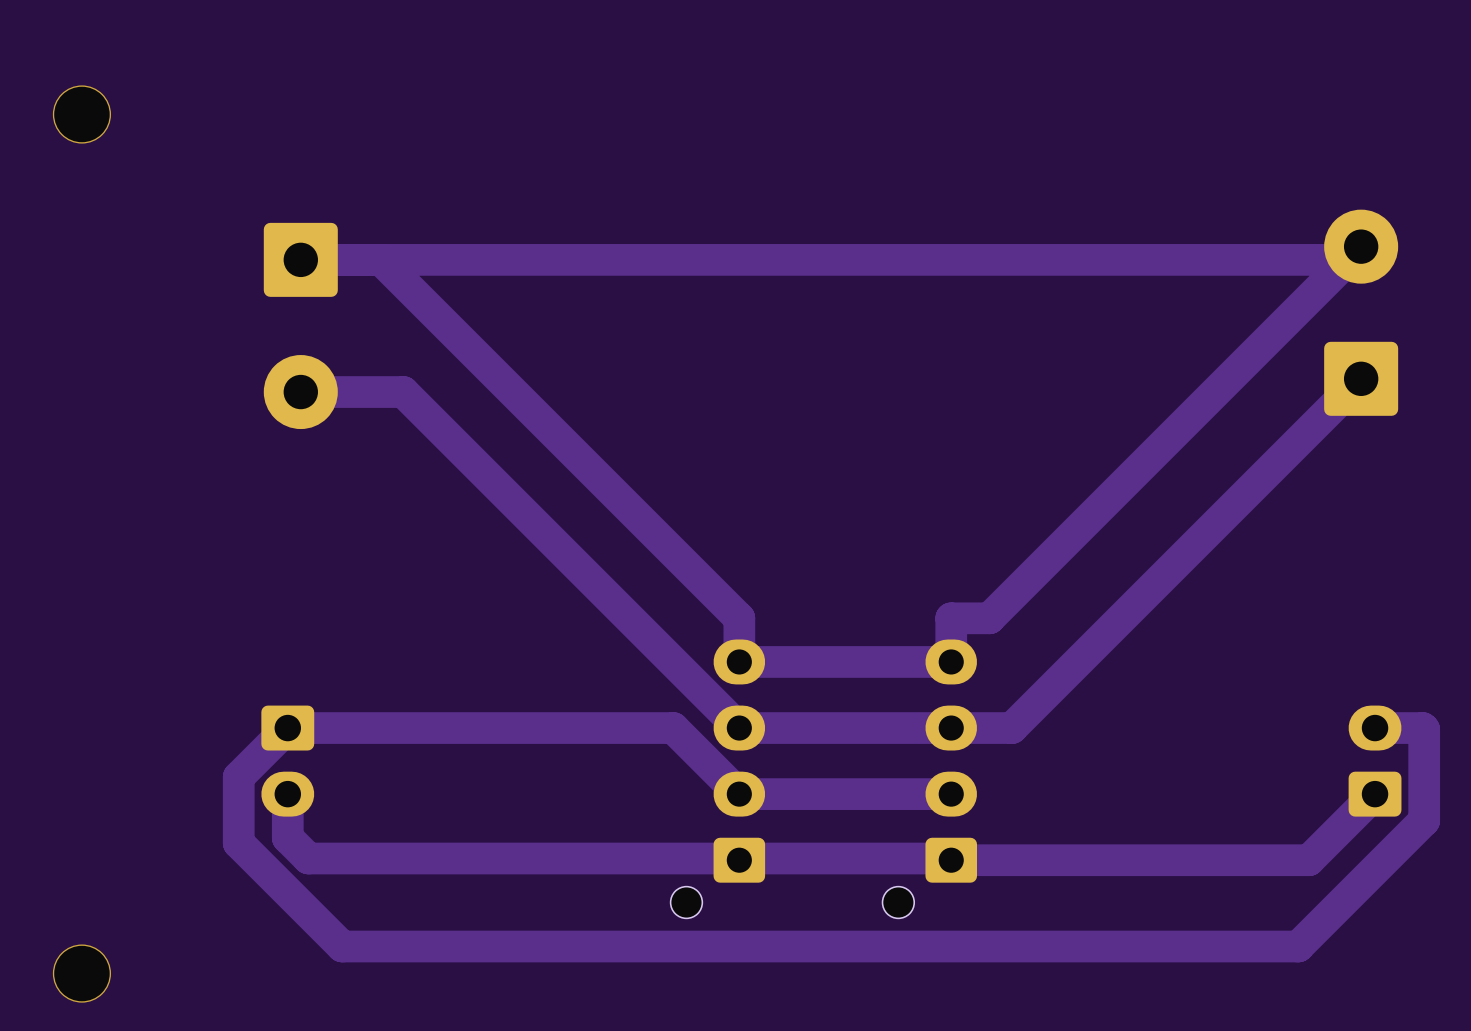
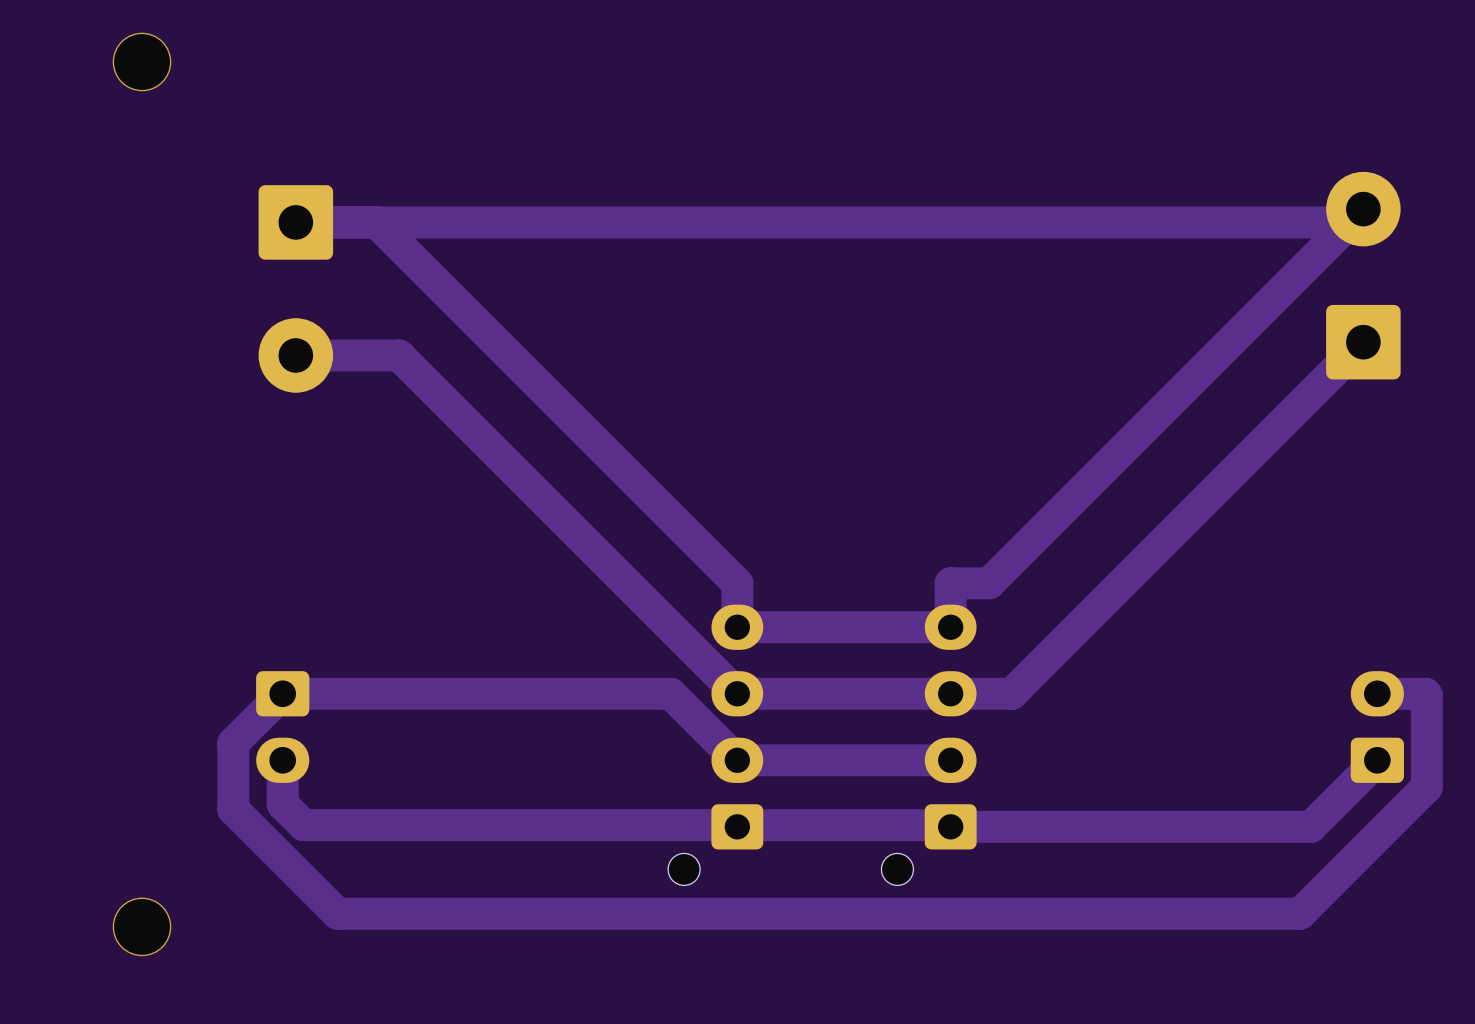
via position: (81, 114) -> (142, 62)
via position: (81, 973) -> (142, 926)

